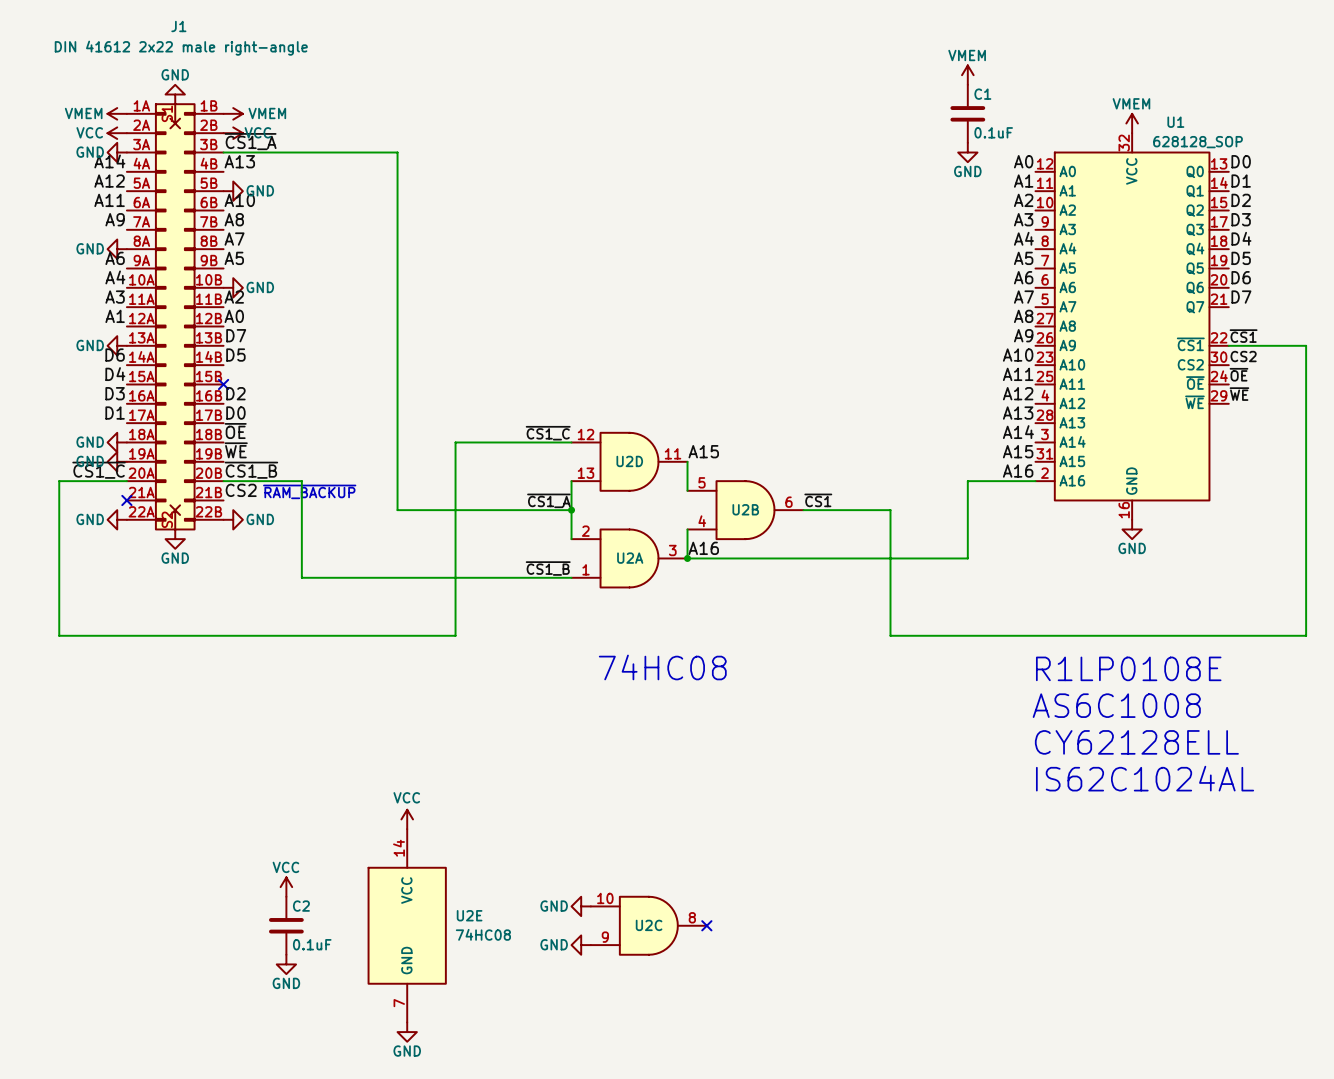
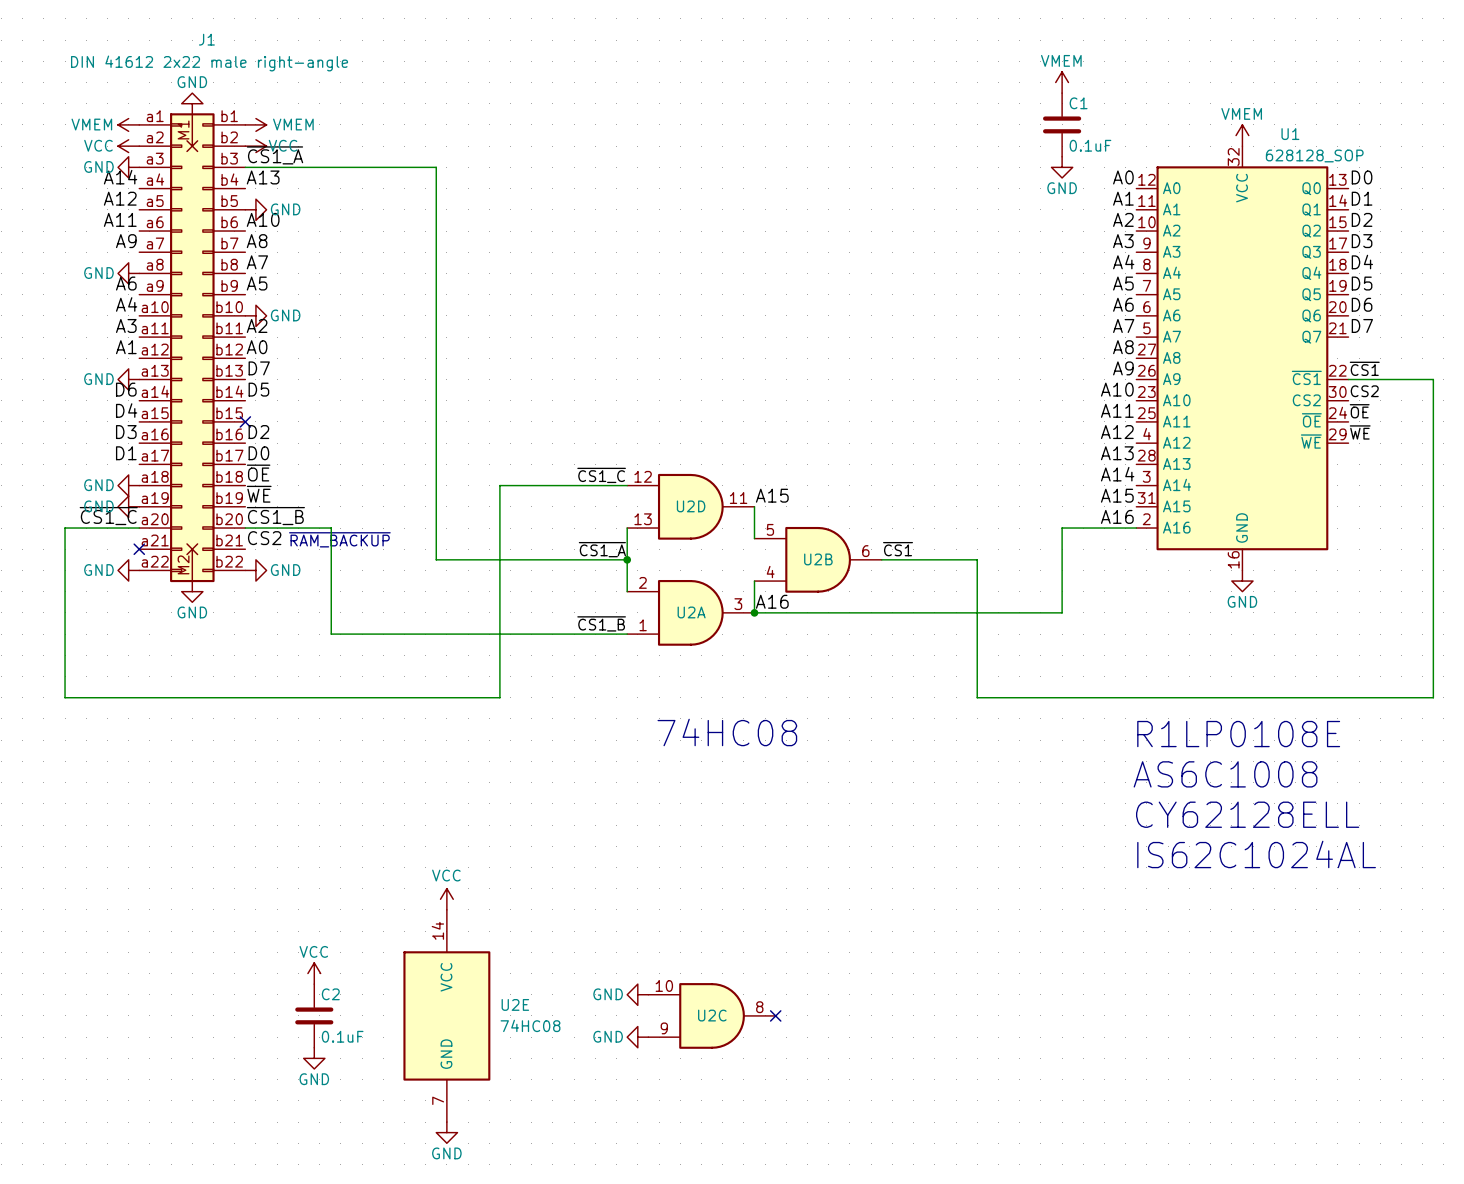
J1 symbol: [126, 103, 224, 531] -> [139, 113, 246, 583]

